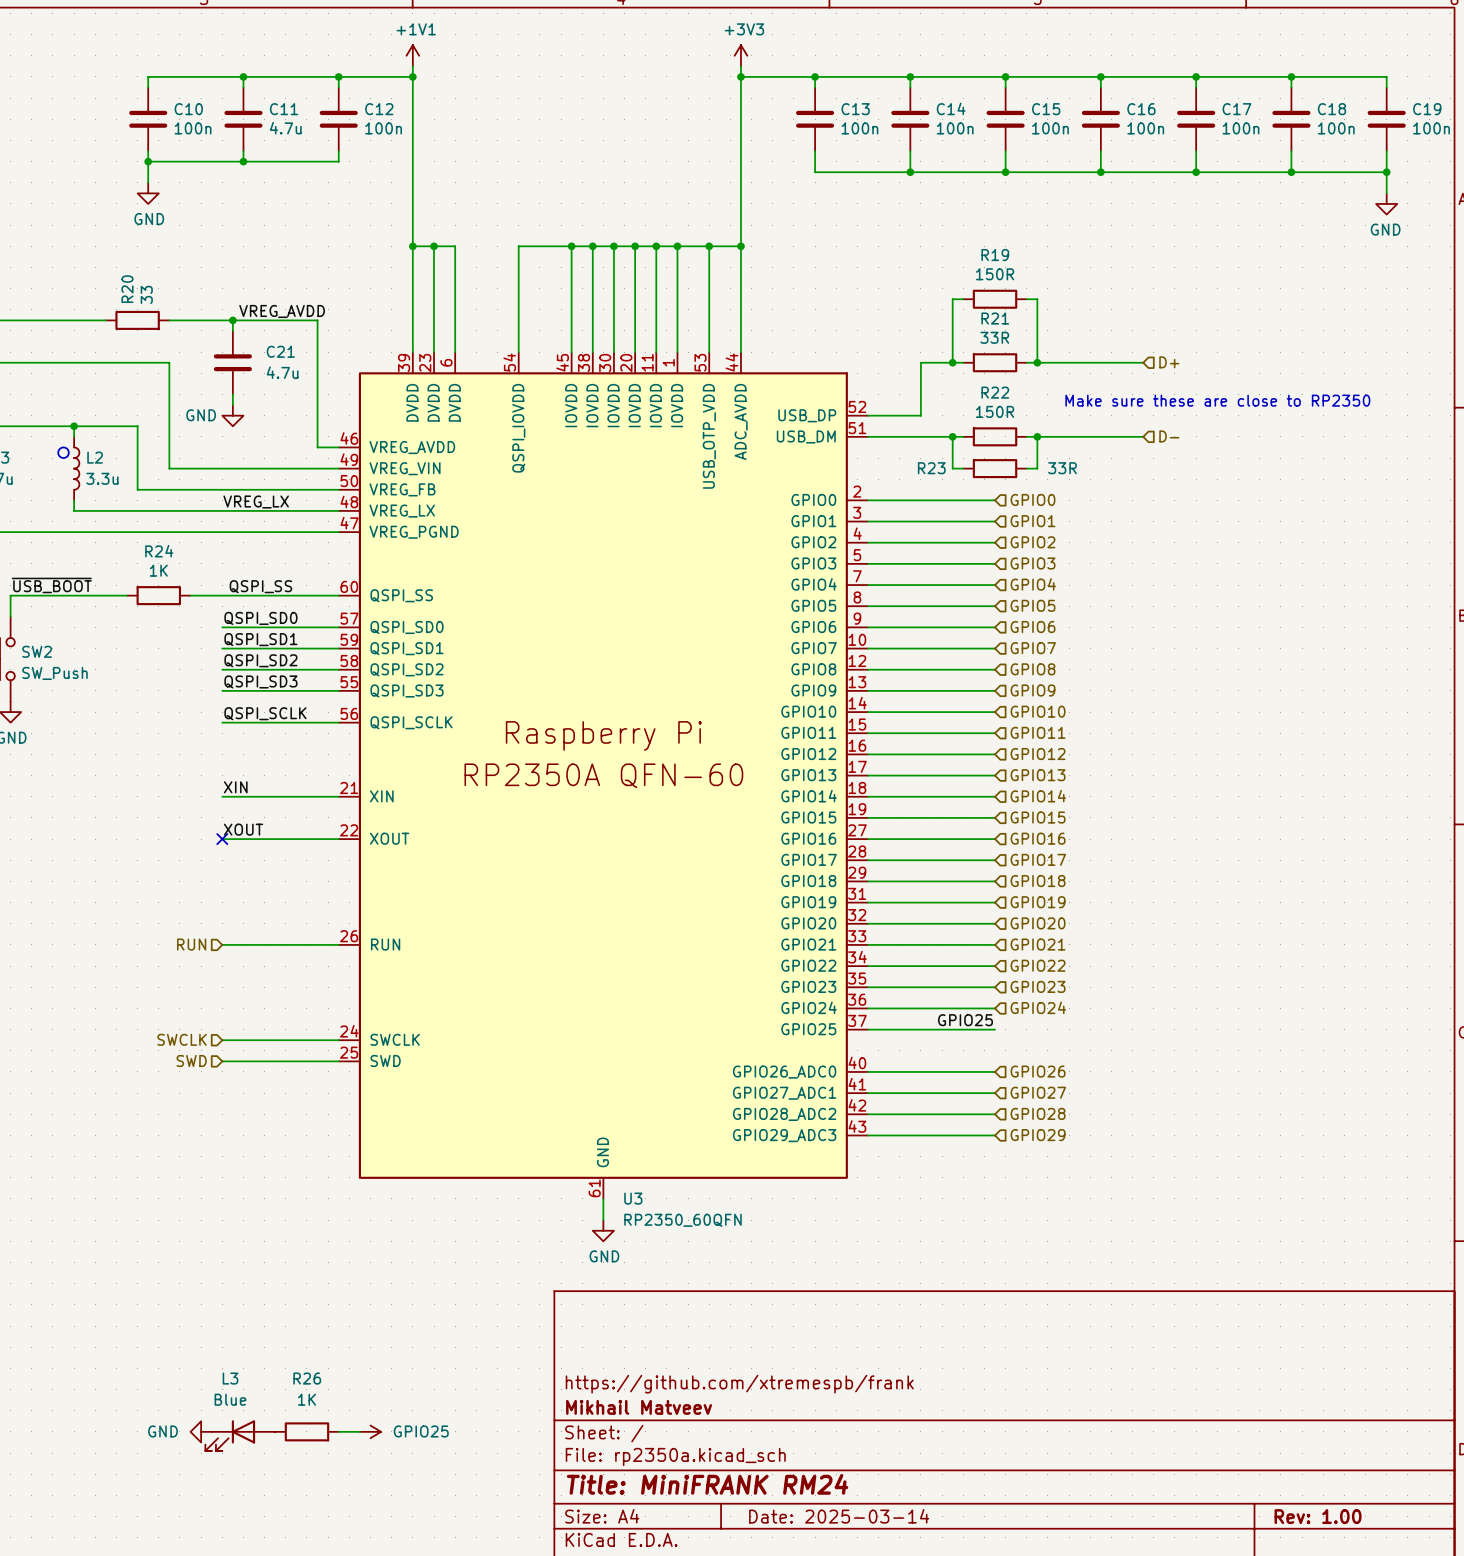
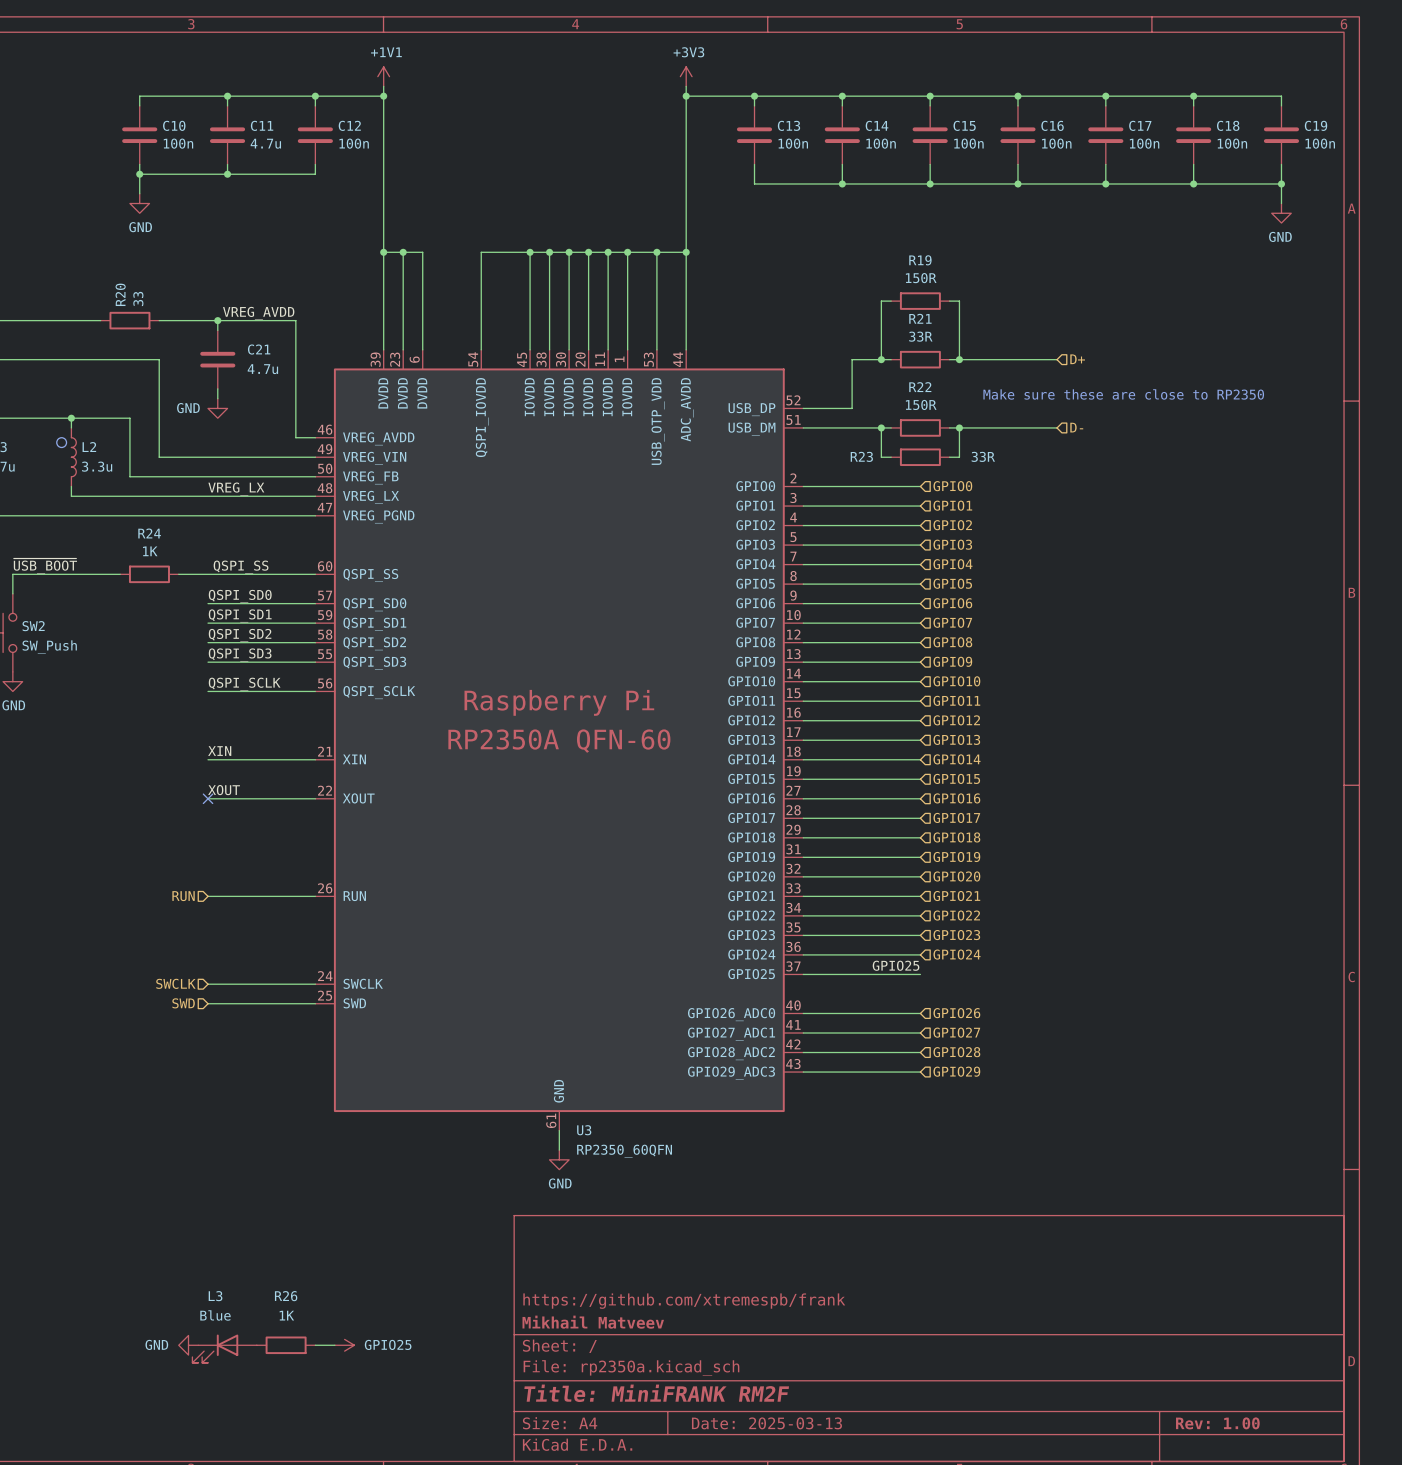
title block: Title: MiniFRANK RM24 (707, 1484) -> Title: MiniFRANK RM2F (656, 1393)
title block: Date: 2025-03-14 (839, 1516) -> Date: 2025-03-13 (766, 1423)

